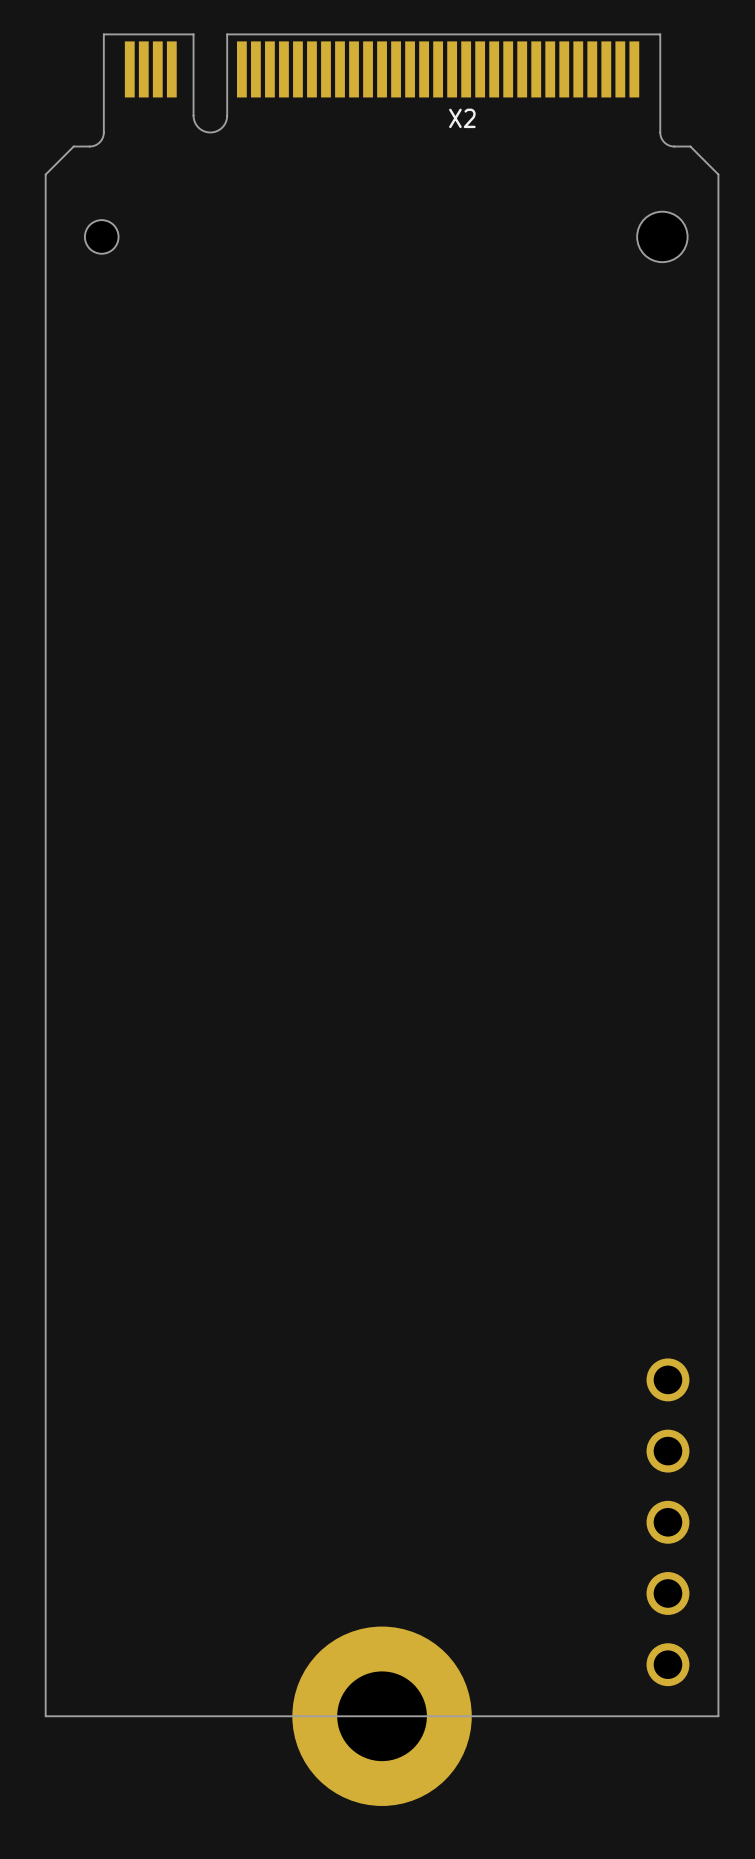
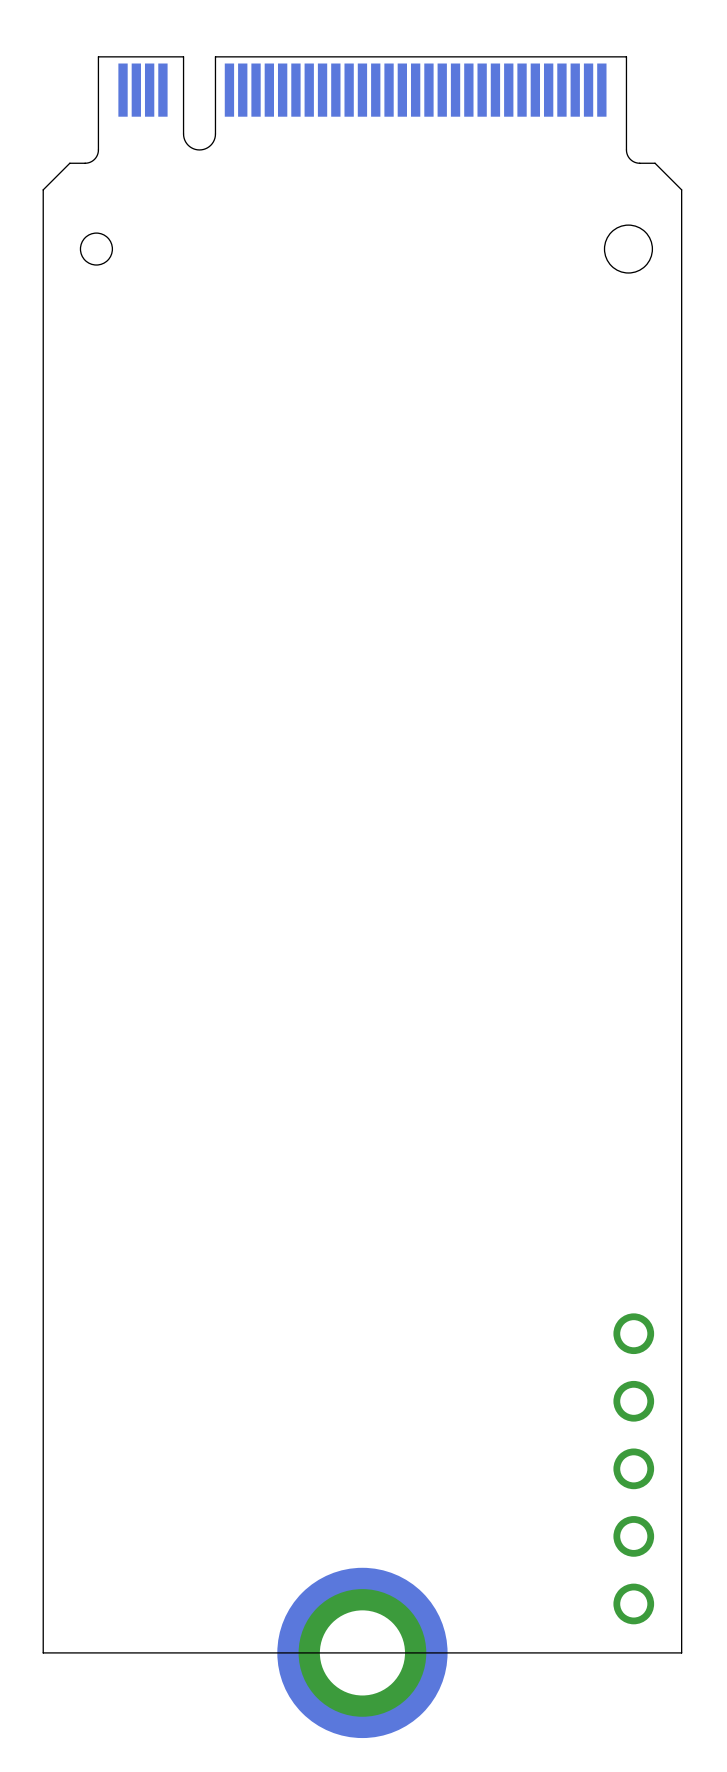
X2 name: X2 (462, 118) -> none

